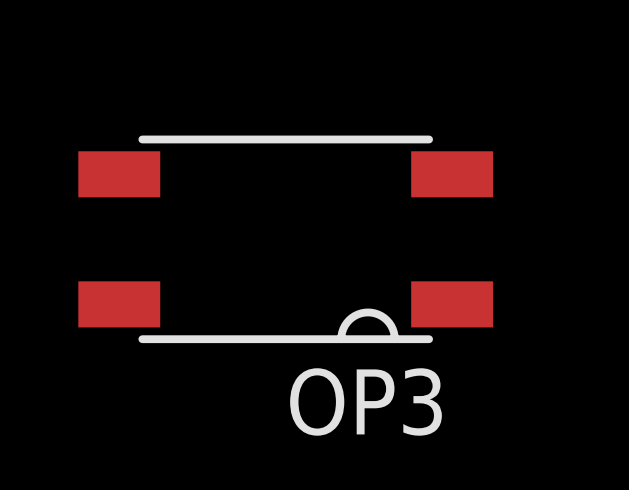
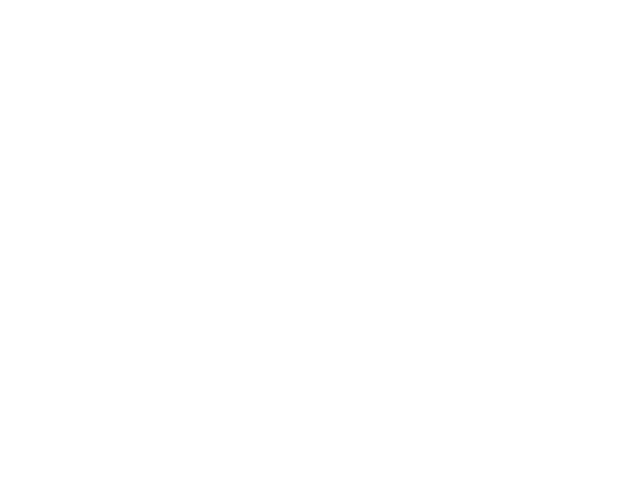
OP3: (285, 239) -> none

